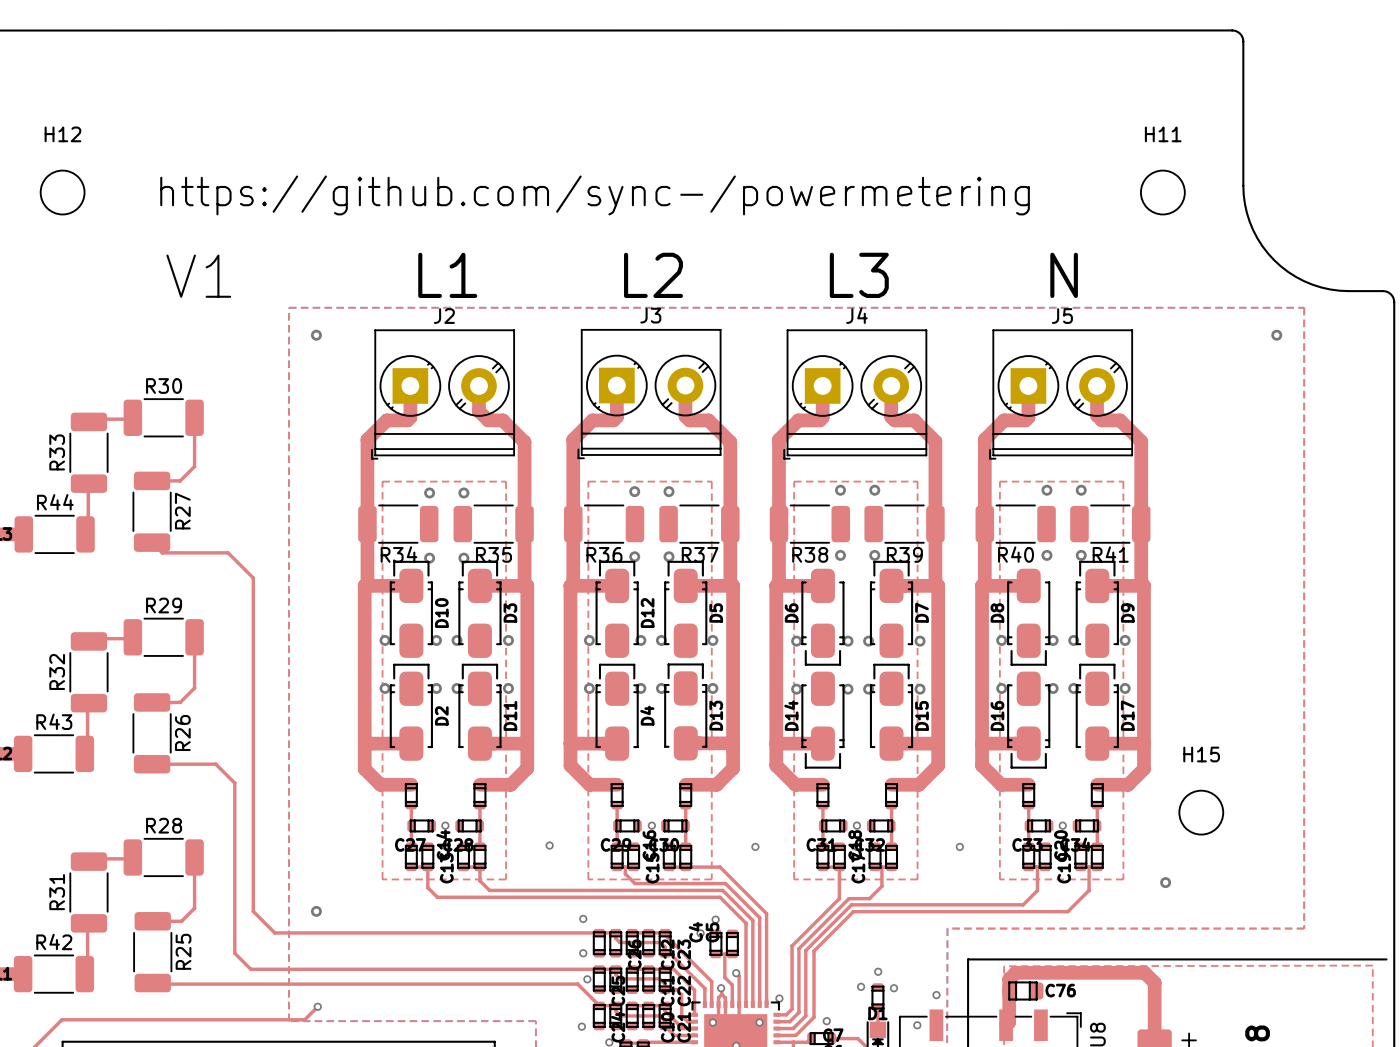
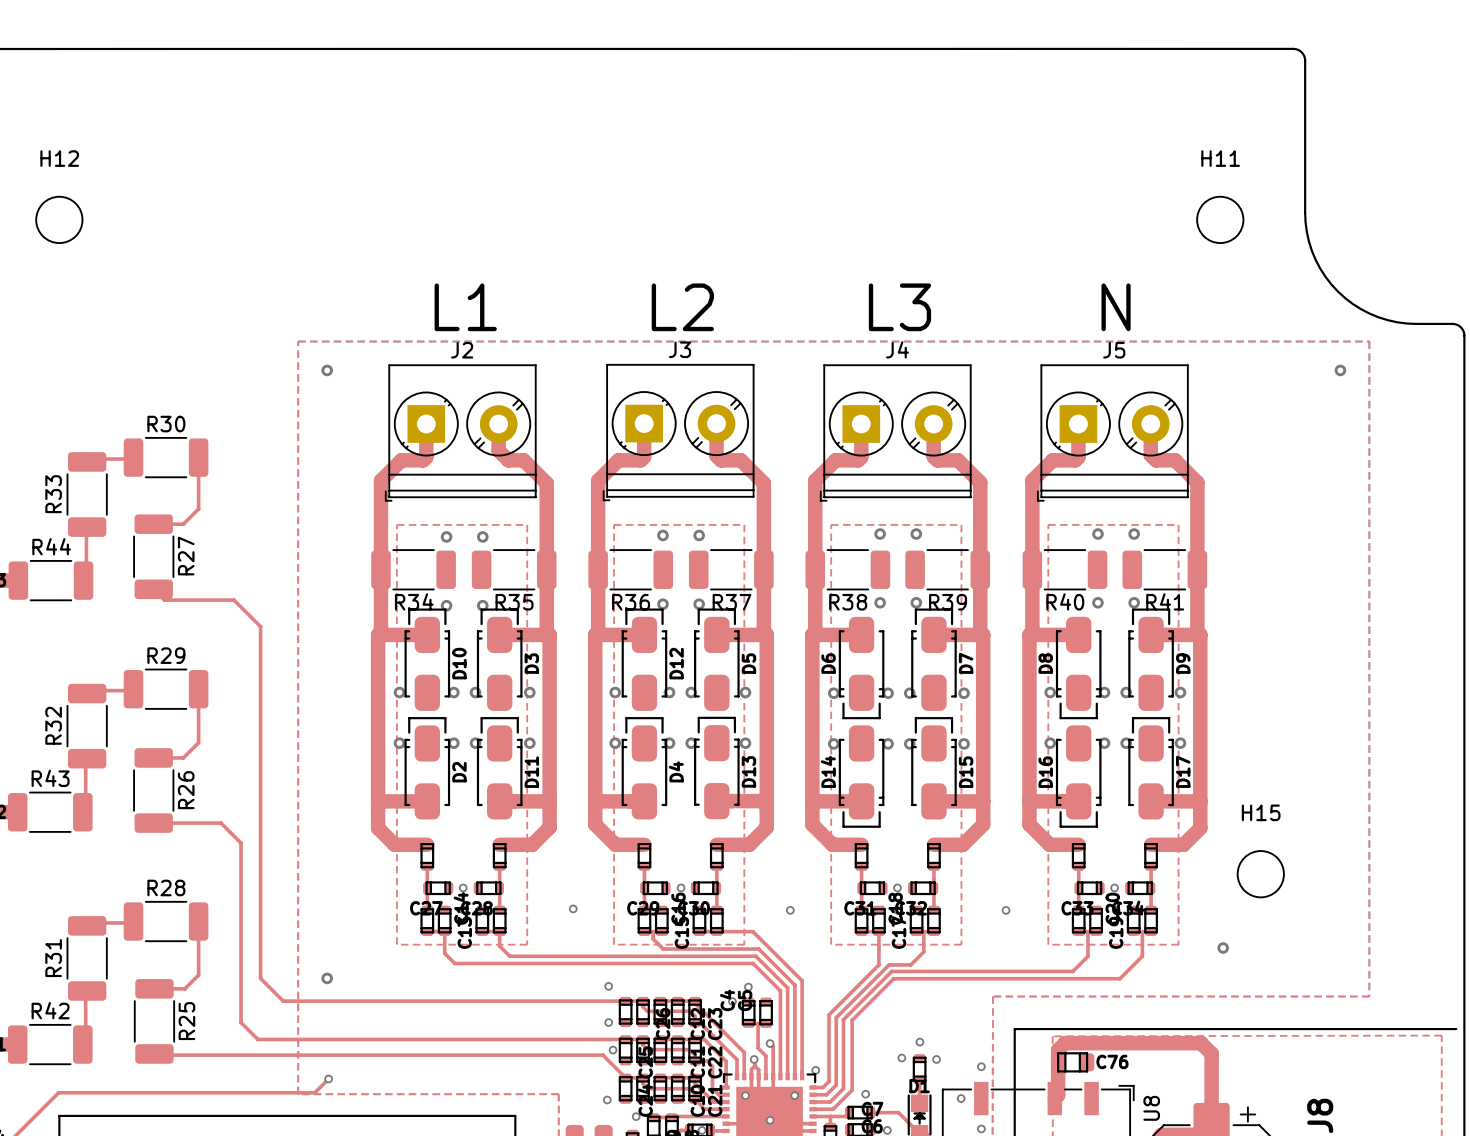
text: https://github.com/sync-/powermetering (595, 195) -> none
text: V1 (198, 276) -> none

